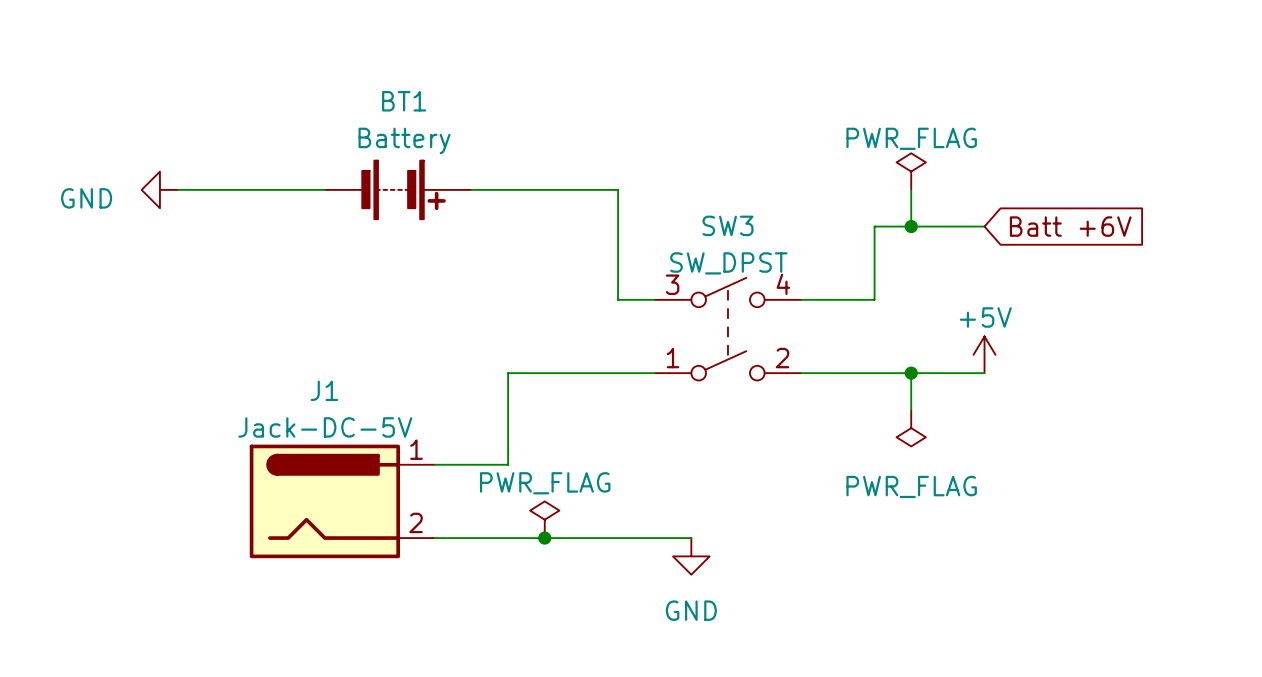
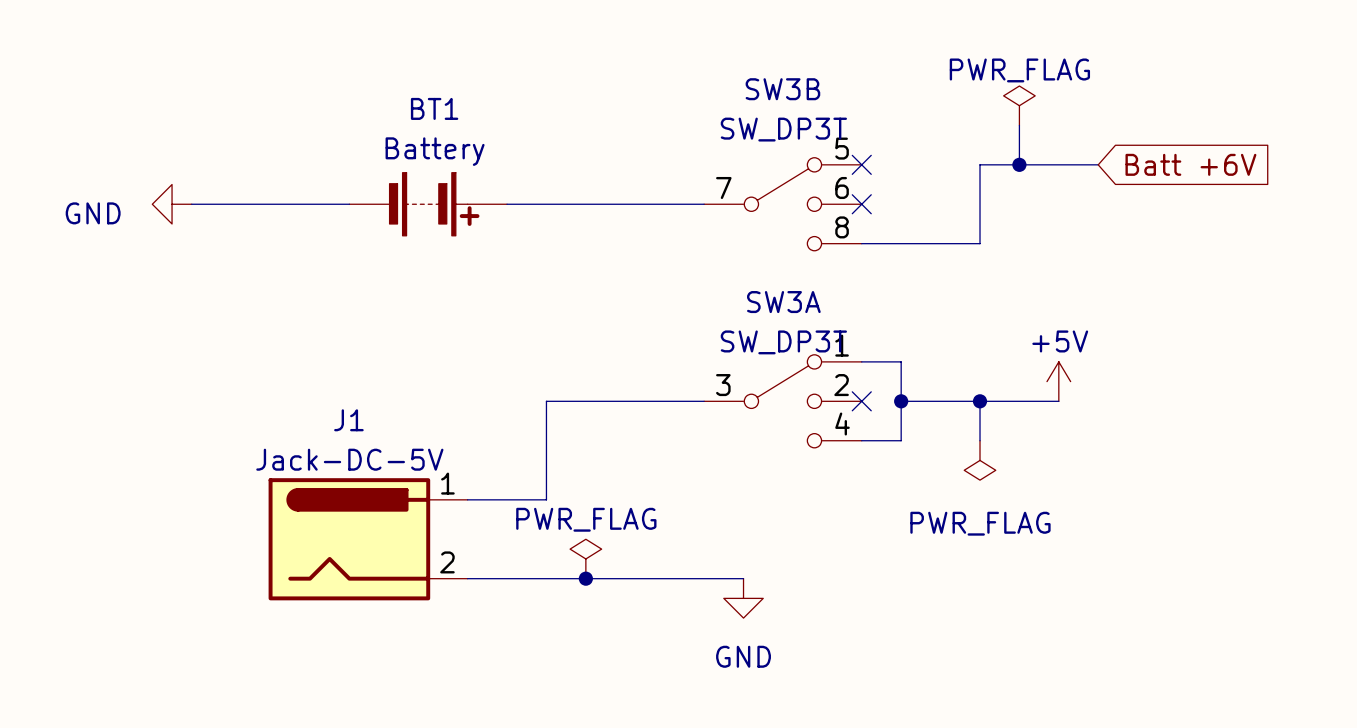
wire: none -> (1019, 125) (1019, 164)
no-connect mark: none -> (861, 164)
junction: none -> (1019, 164)
wire: none -> (1098, 164) (980, 164) (980, 204)
power symbol position: PWR_FLAG (911, 171) -> PWR_FLAG (1019, 105)
wire: (618, 189) (618, 299) (654, 299) -> (664, 204) (704, 204)
SW3B: none -> SW_DP3T (782, 204)
no-connect mark: none -> (861, 204)
wire: (874, 226) (874, 299) (801, 299) -> (940, 243) (861, 243)
wire: (911, 226) (984, 226) -> none
junction: (911, 226) -> none
global label position: Batt +6V (1070, 226) -> Batt +6V (1190, 164)
SW3: SW_DPST (727, 329) -> none
wire: none -> (861, 361) (901, 361) (901, 440) (861, 440)
SW3A: none -> SW_DP3T (782, 401)
wire: (801, 373) (837, 373) -> none
no-connect mark: none -> (861, 401)
junction: none -> (901, 401)

